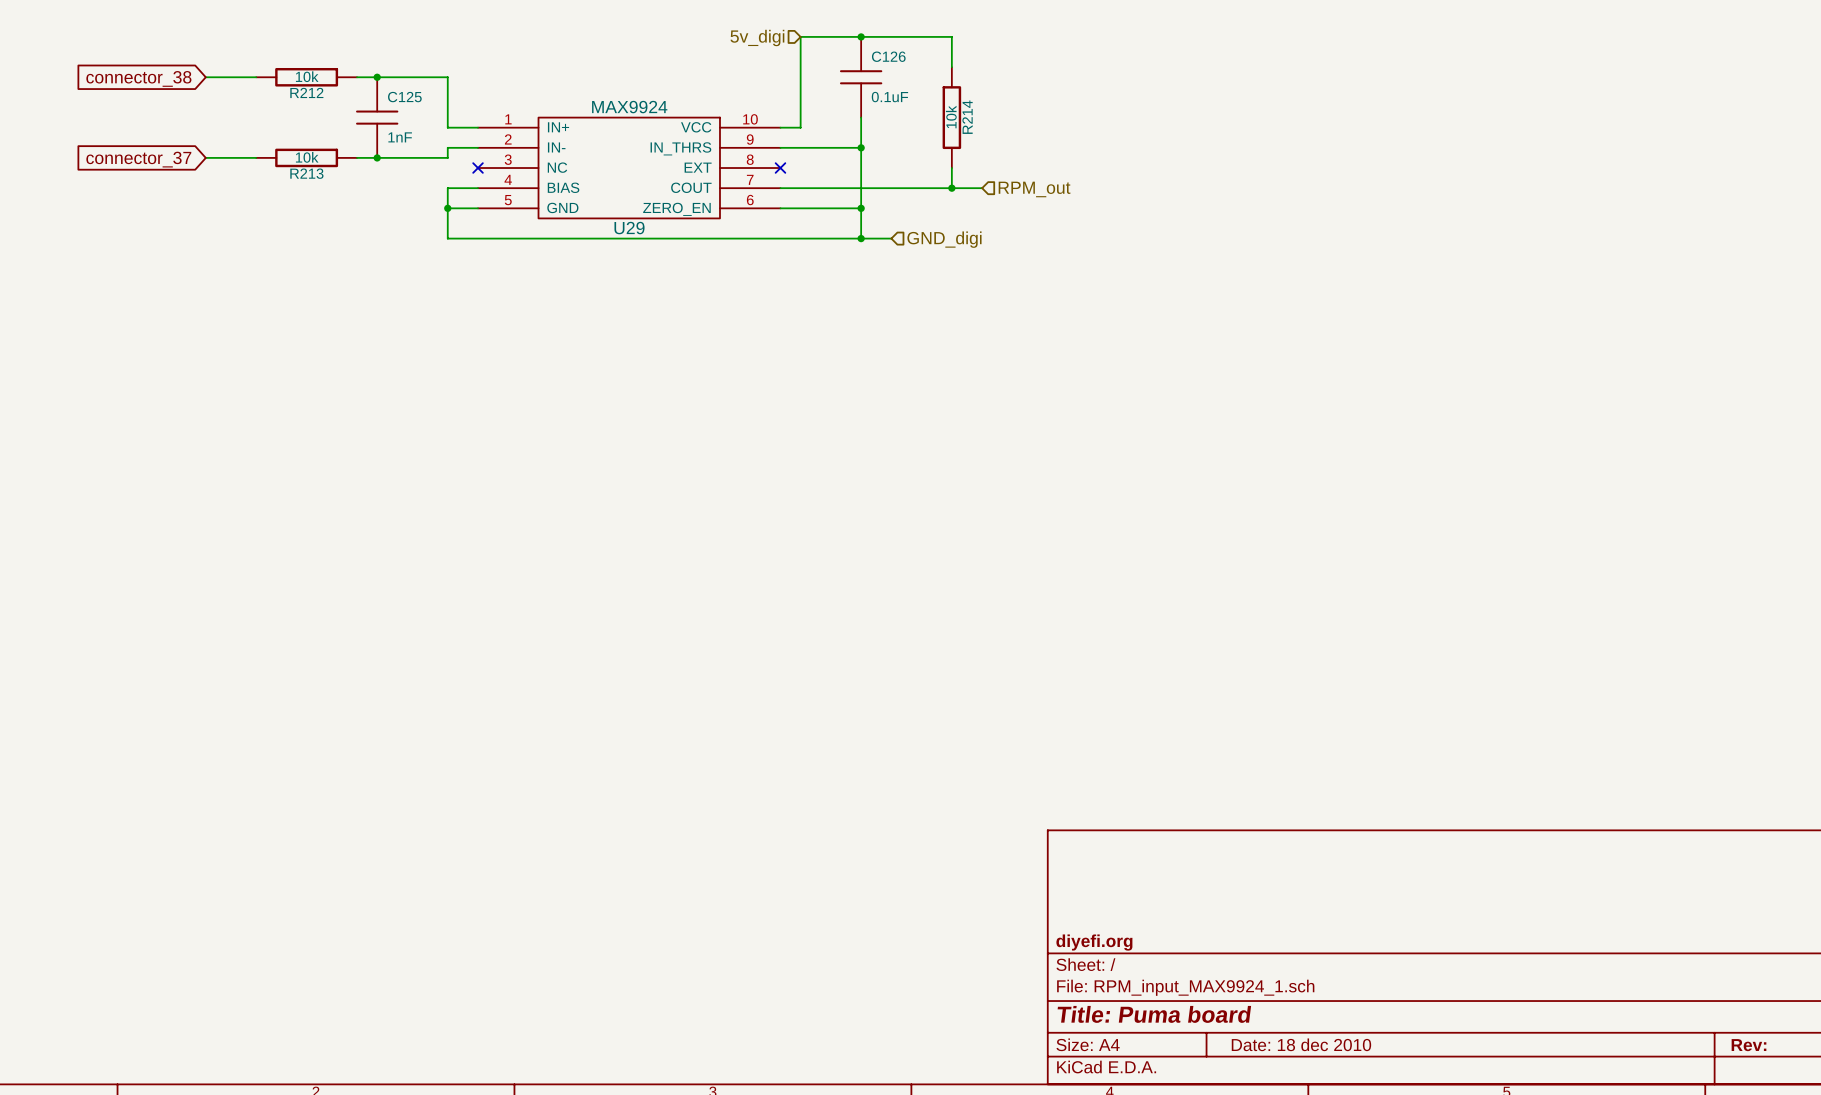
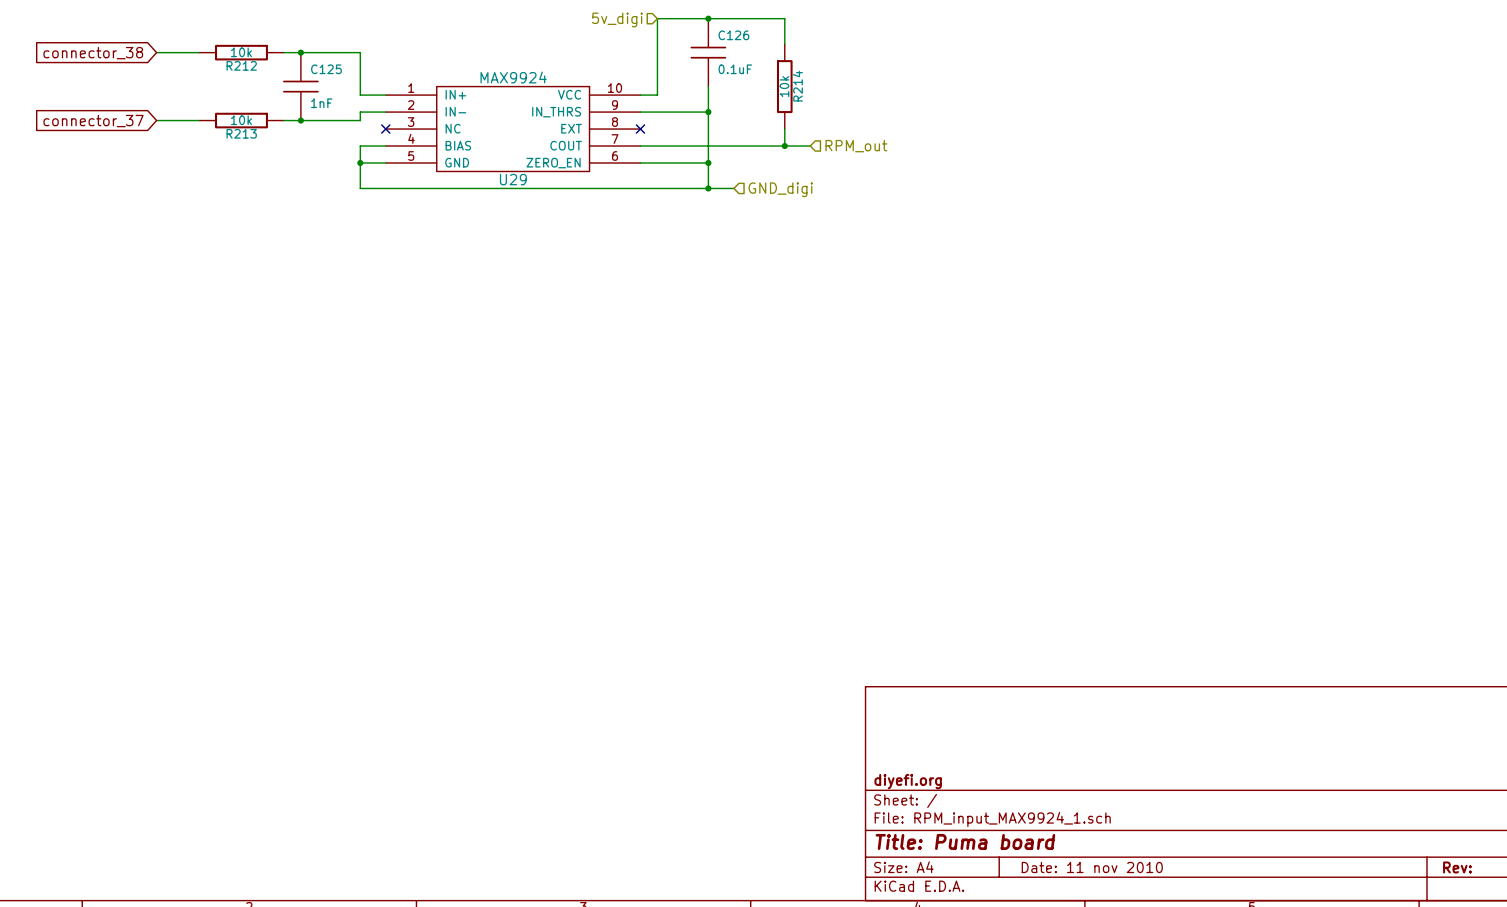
title block: Date: 18 dec 2010 (1301, 1044) -> Date: 11 nov 2010 (1092, 867)

